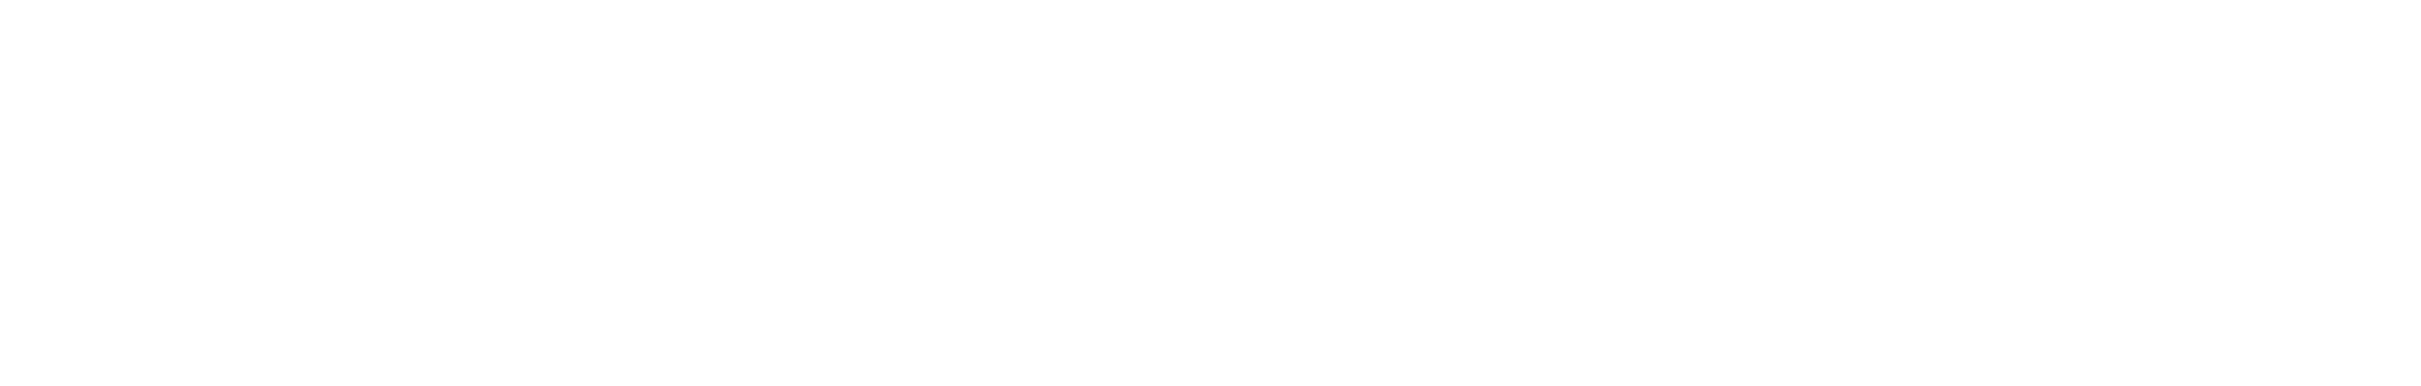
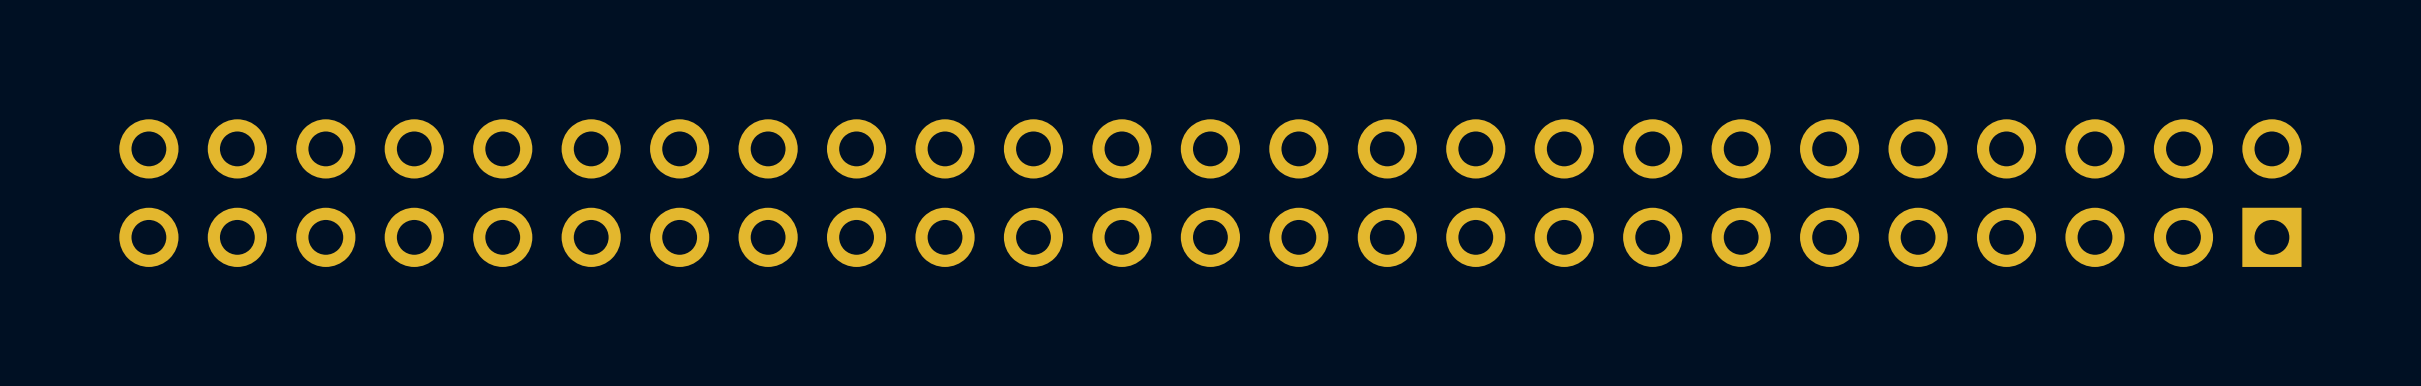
part: none -> (1210, 193)

